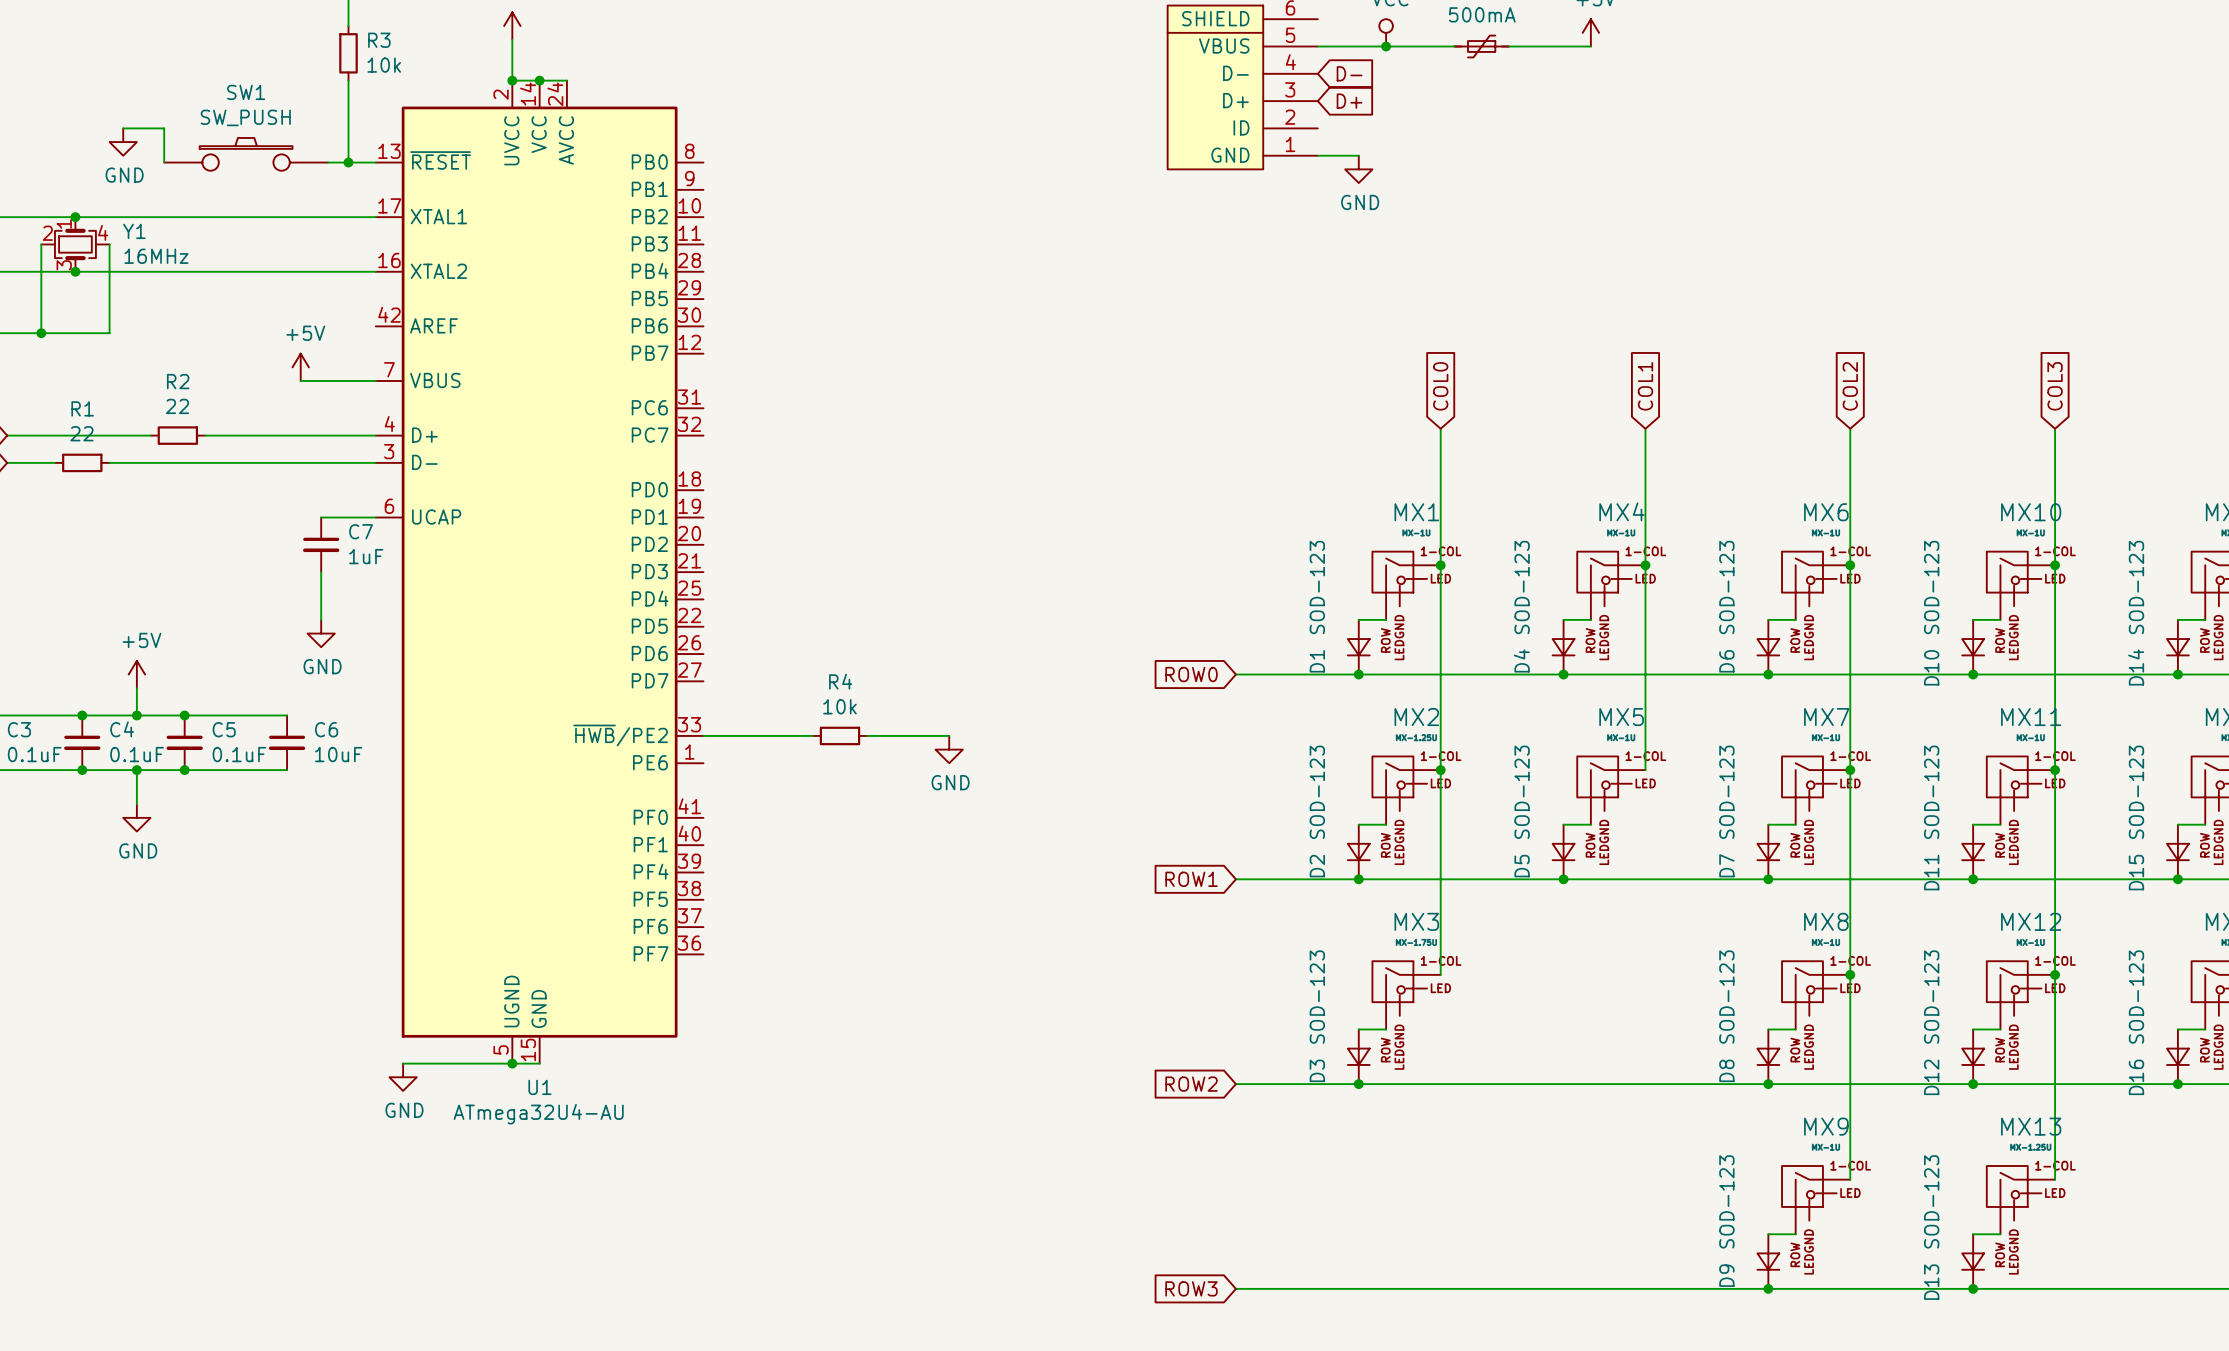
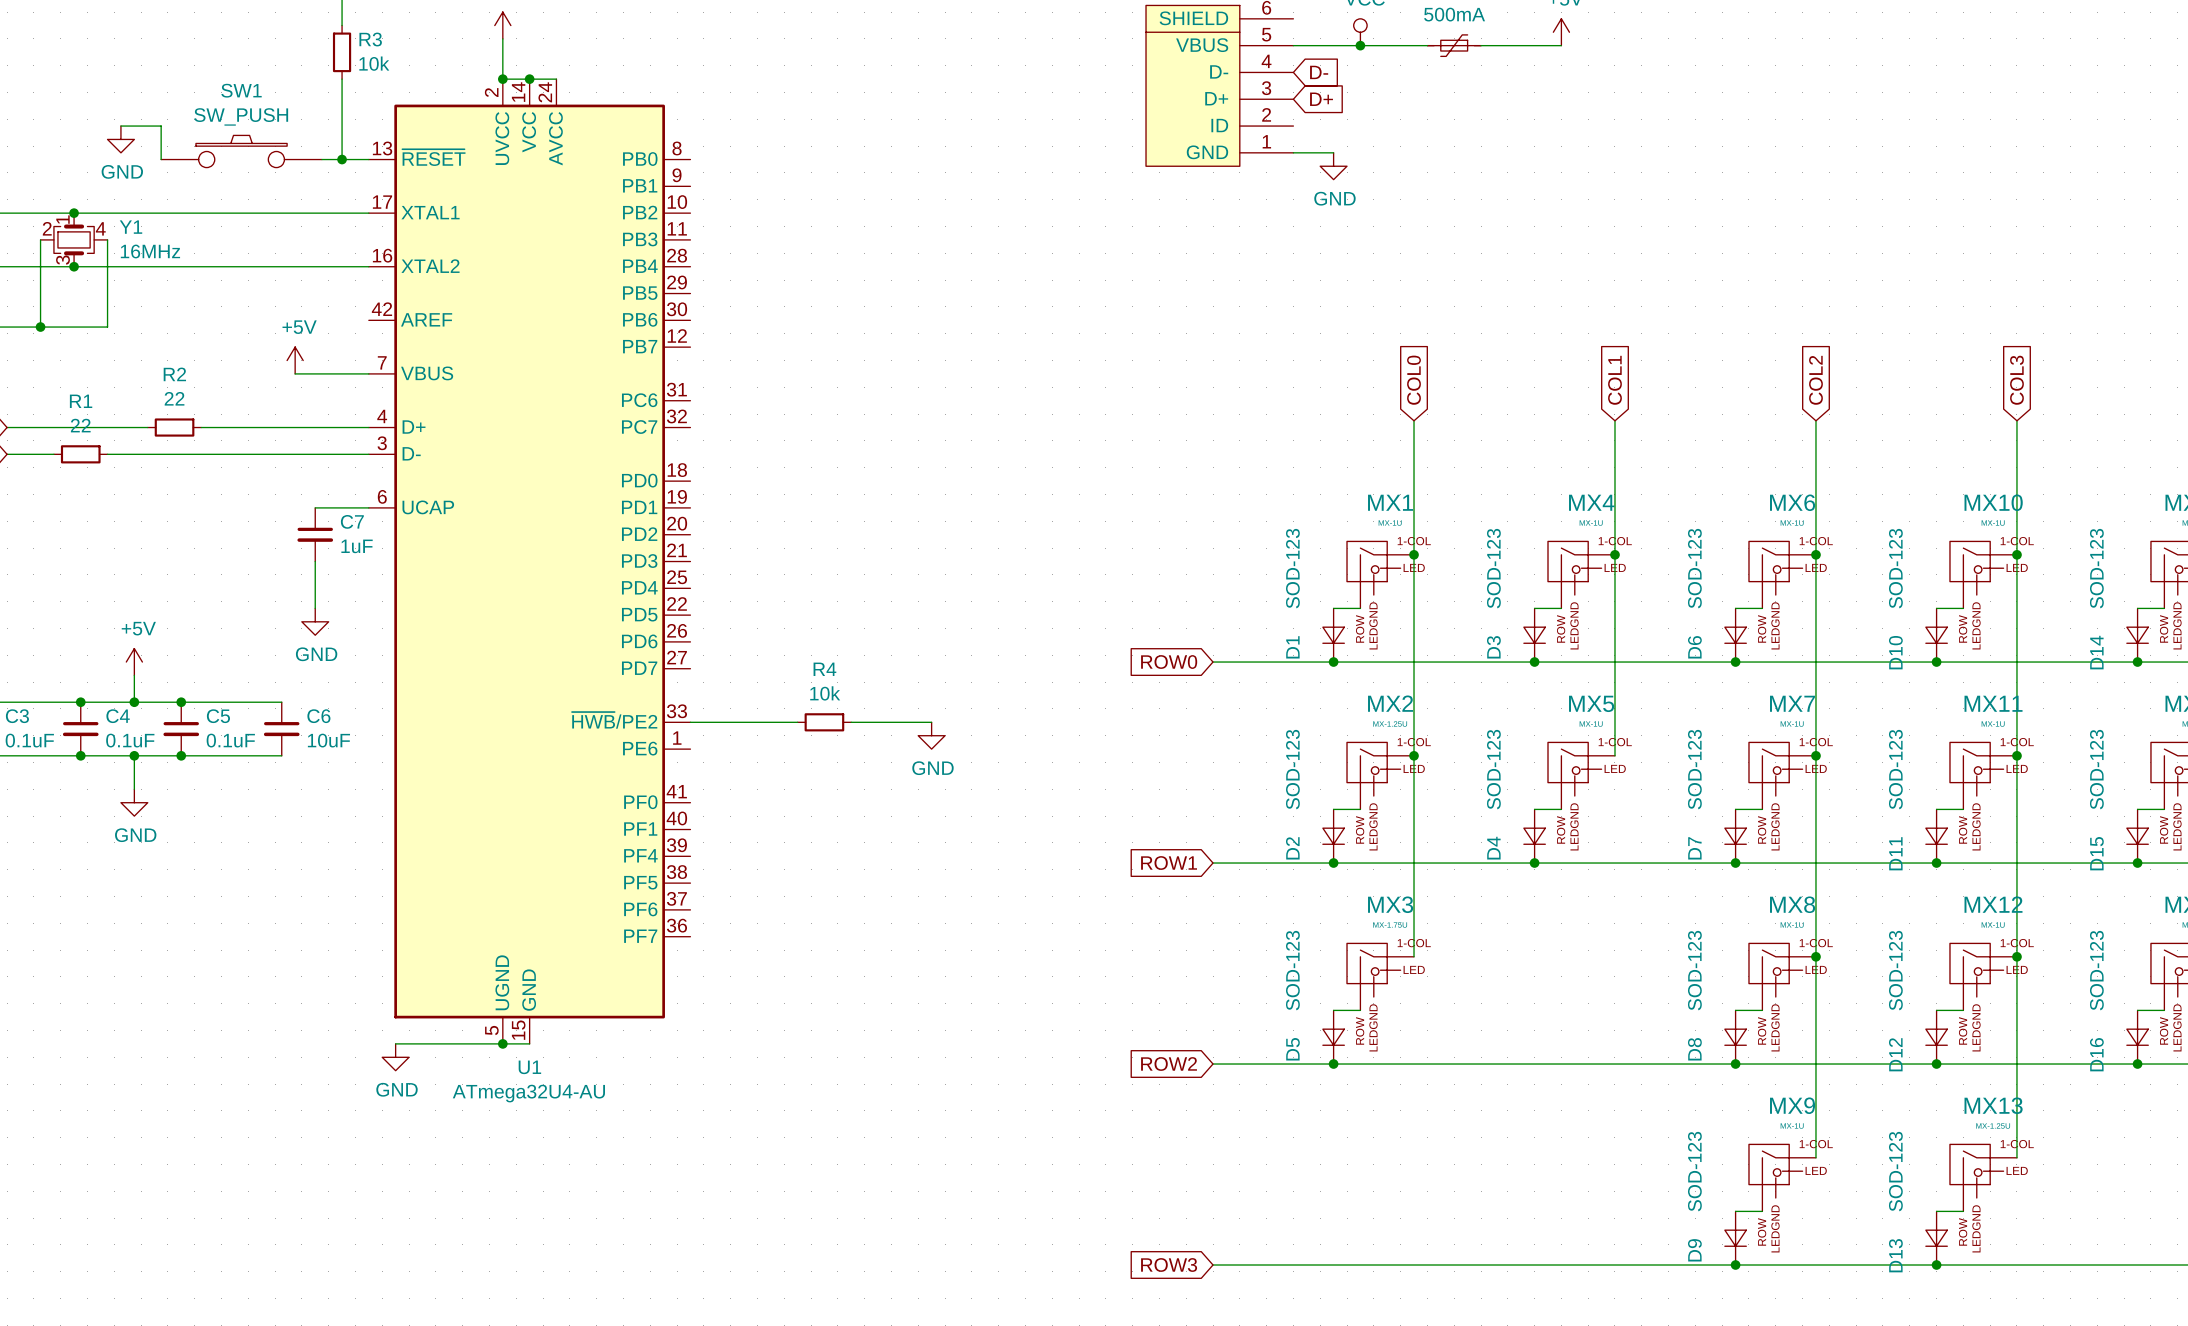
D4 name: D4 (1521, 660) -> D3 (1493, 647)
D5 name: D5 (1522, 866) -> D4 (1493, 848)
D3 name: D3 (1317, 1070) -> D5 (1293, 1049)

